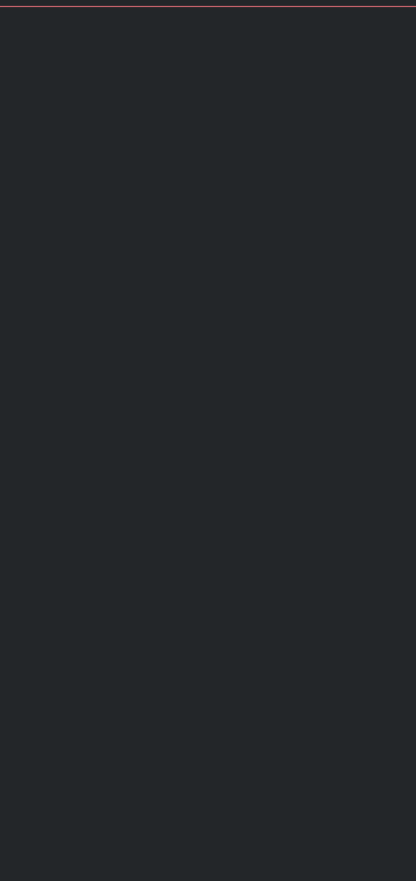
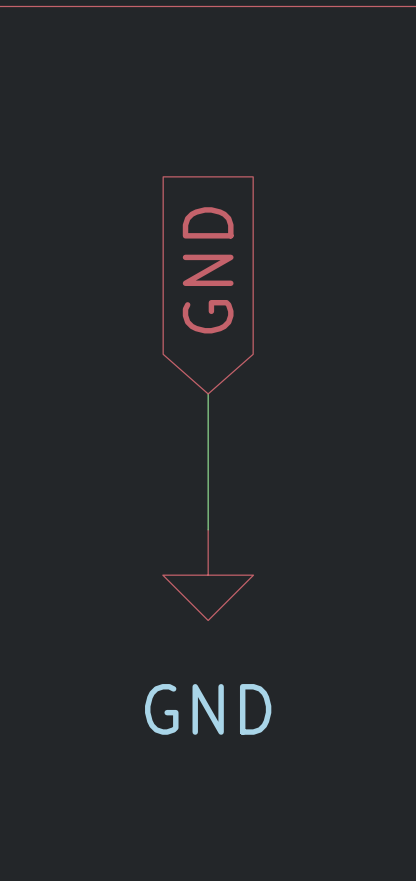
global label: none -> GND (208, 270)
wire: none -> (208, 393) (208, 529)
power symbol: none -> GND (208, 575)

